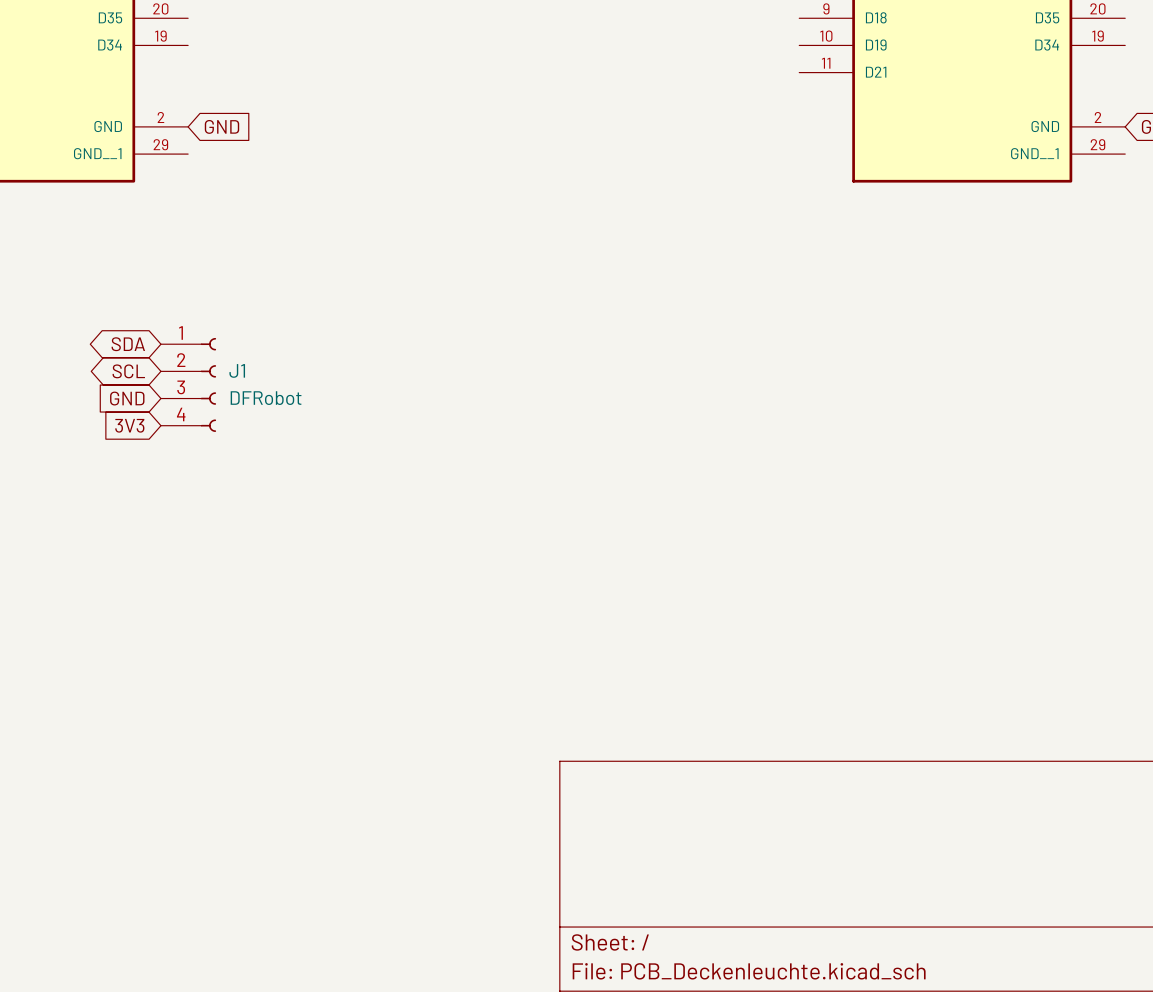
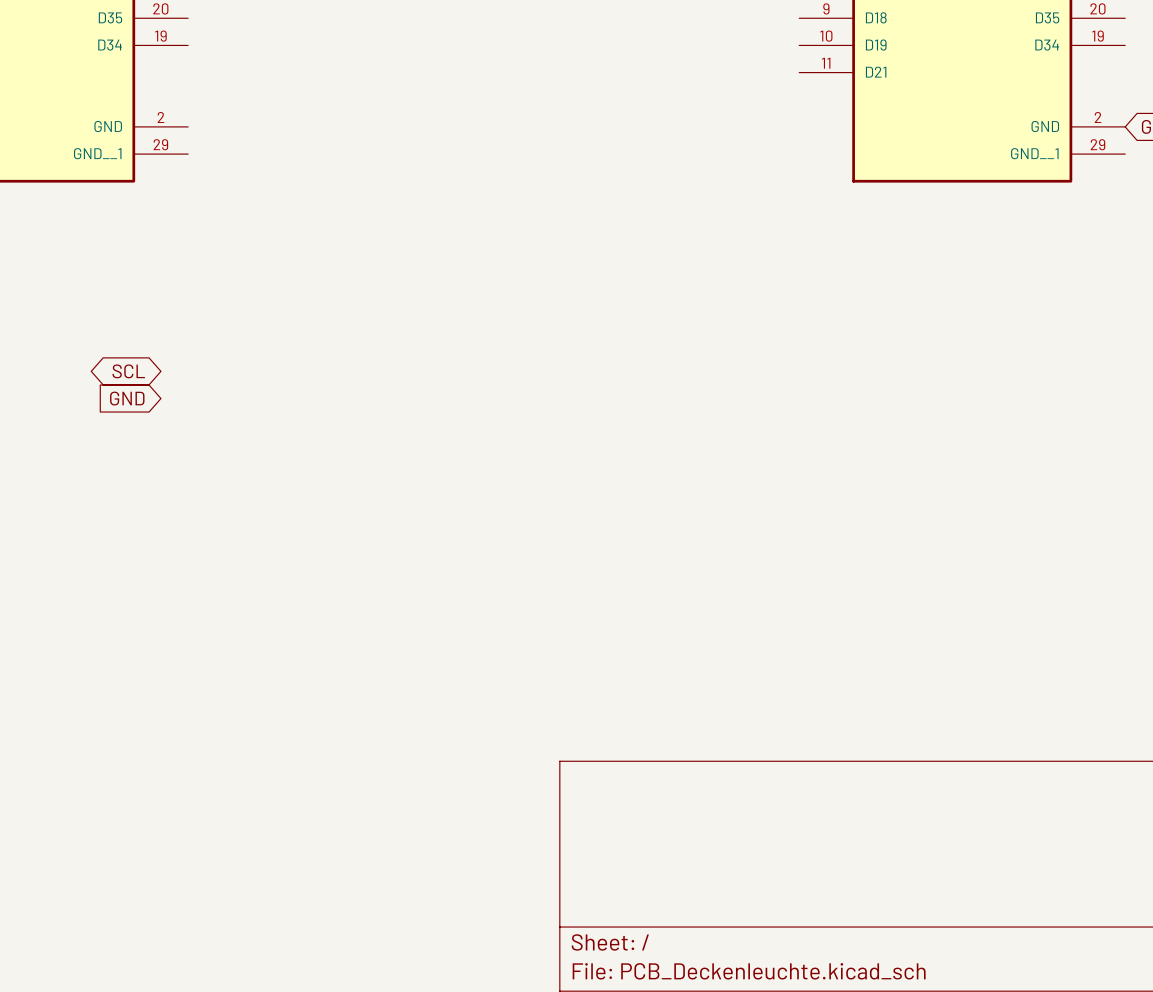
global label: GND (221, 126) -> none
global label: SDA (128, 344) -> none
J1: DFRobot (188, 384) -> none
global label: 3V3 (129, 425) -> none

